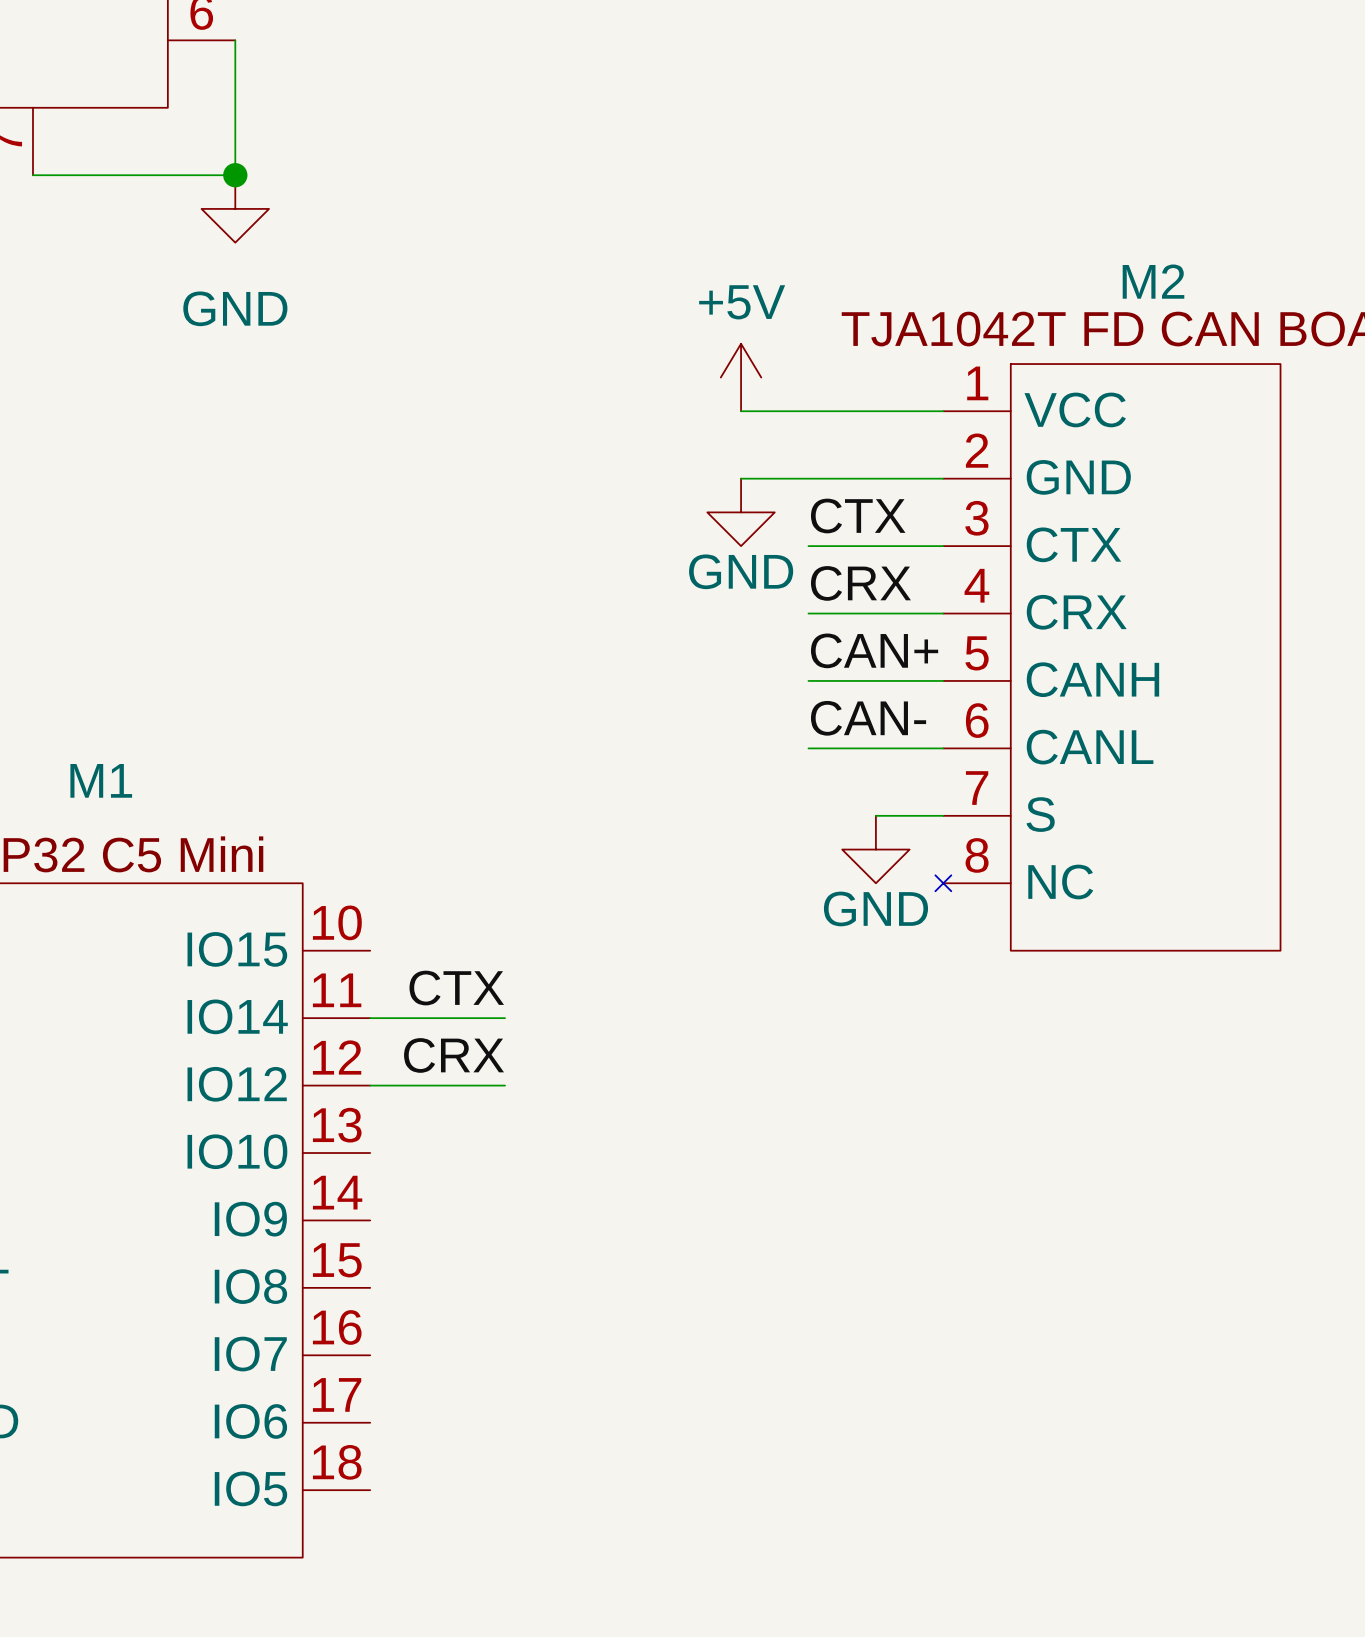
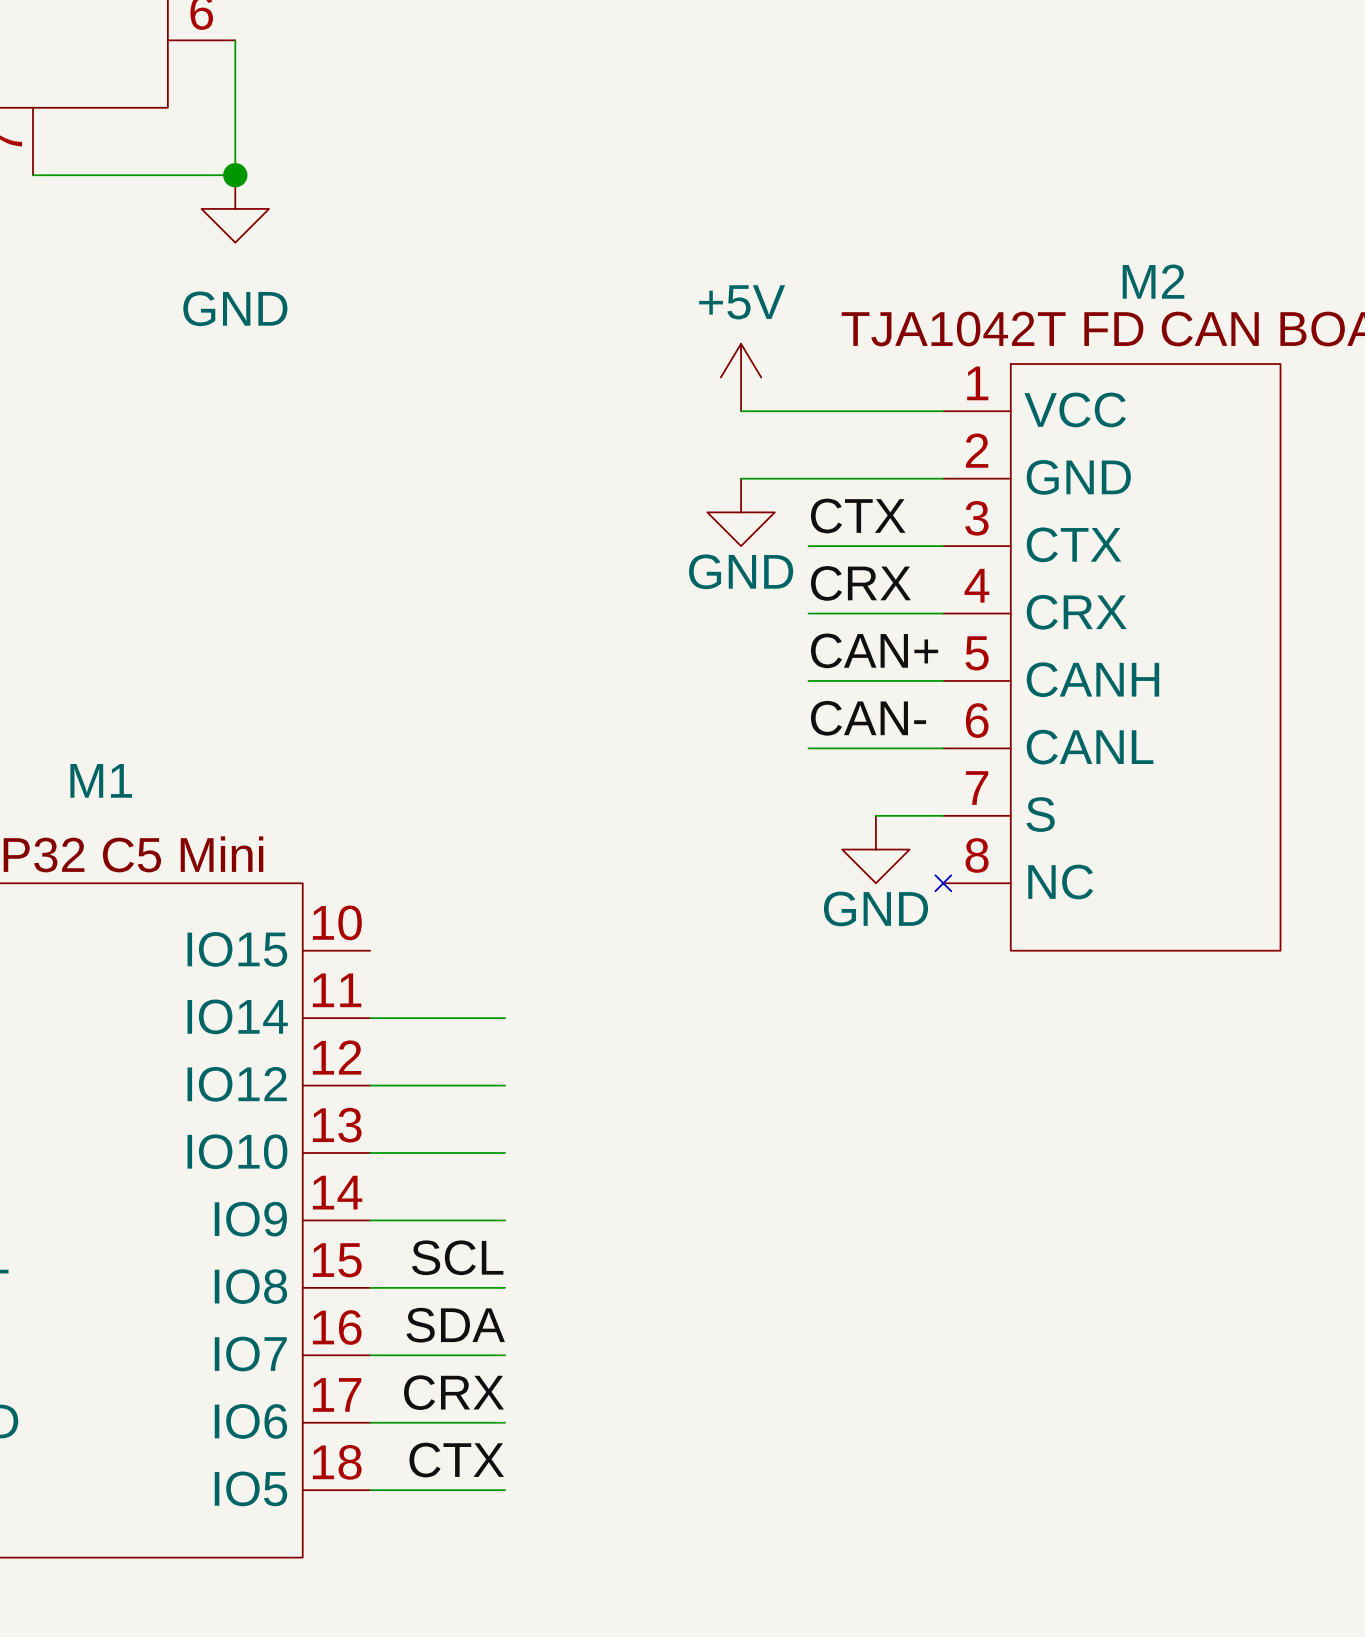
label position: CTX (456, 988) -> CTX (456, 1460)
label position: CRX (454, 1055) -> CRX (454, 1392)
wire: none -> (370, 1153) (505, 1153)
wire: none -> (370, 1220) (505, 1220)
label: none -> SCL (457, 1257)
wire: none -> (370, 1287) (505, 1287)
label: none -> SDA (455, 1325)
wire: none -> (370, 1355) (505, 1355)
wire: none -> (370, 1422) (505, 1422)
wire: none -> (370, 1490) (505, 1490)

